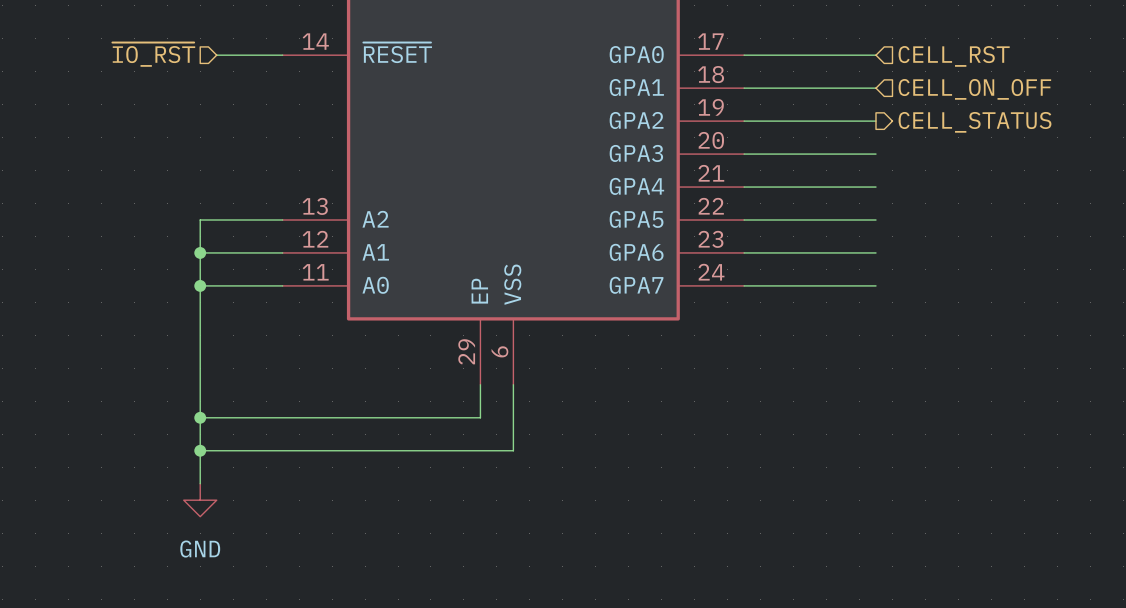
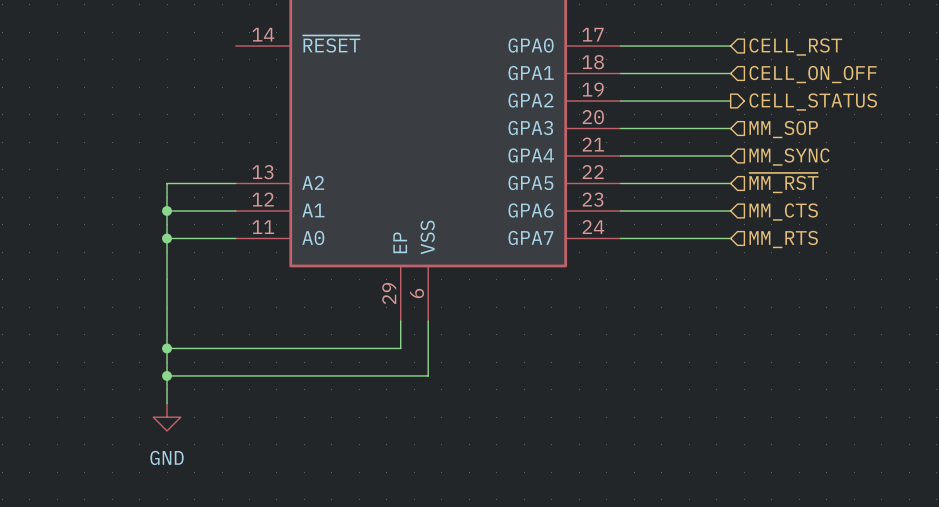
hierarchical label: ~{IO_RST} (153, 54) -> none
wire: (216, 55) (282, 55) -> none
hierarchical label: none -> MM_SOP (783, 129)
hierarchical label: none -> MM_SYNC (789, 157)
hierarchical label: none -> ~{MM_RST} (783, 183)
hierarchical label: none -> MM_CTS (783, 212)
hierarchical label: none -> MM_RTS (783, 239)

